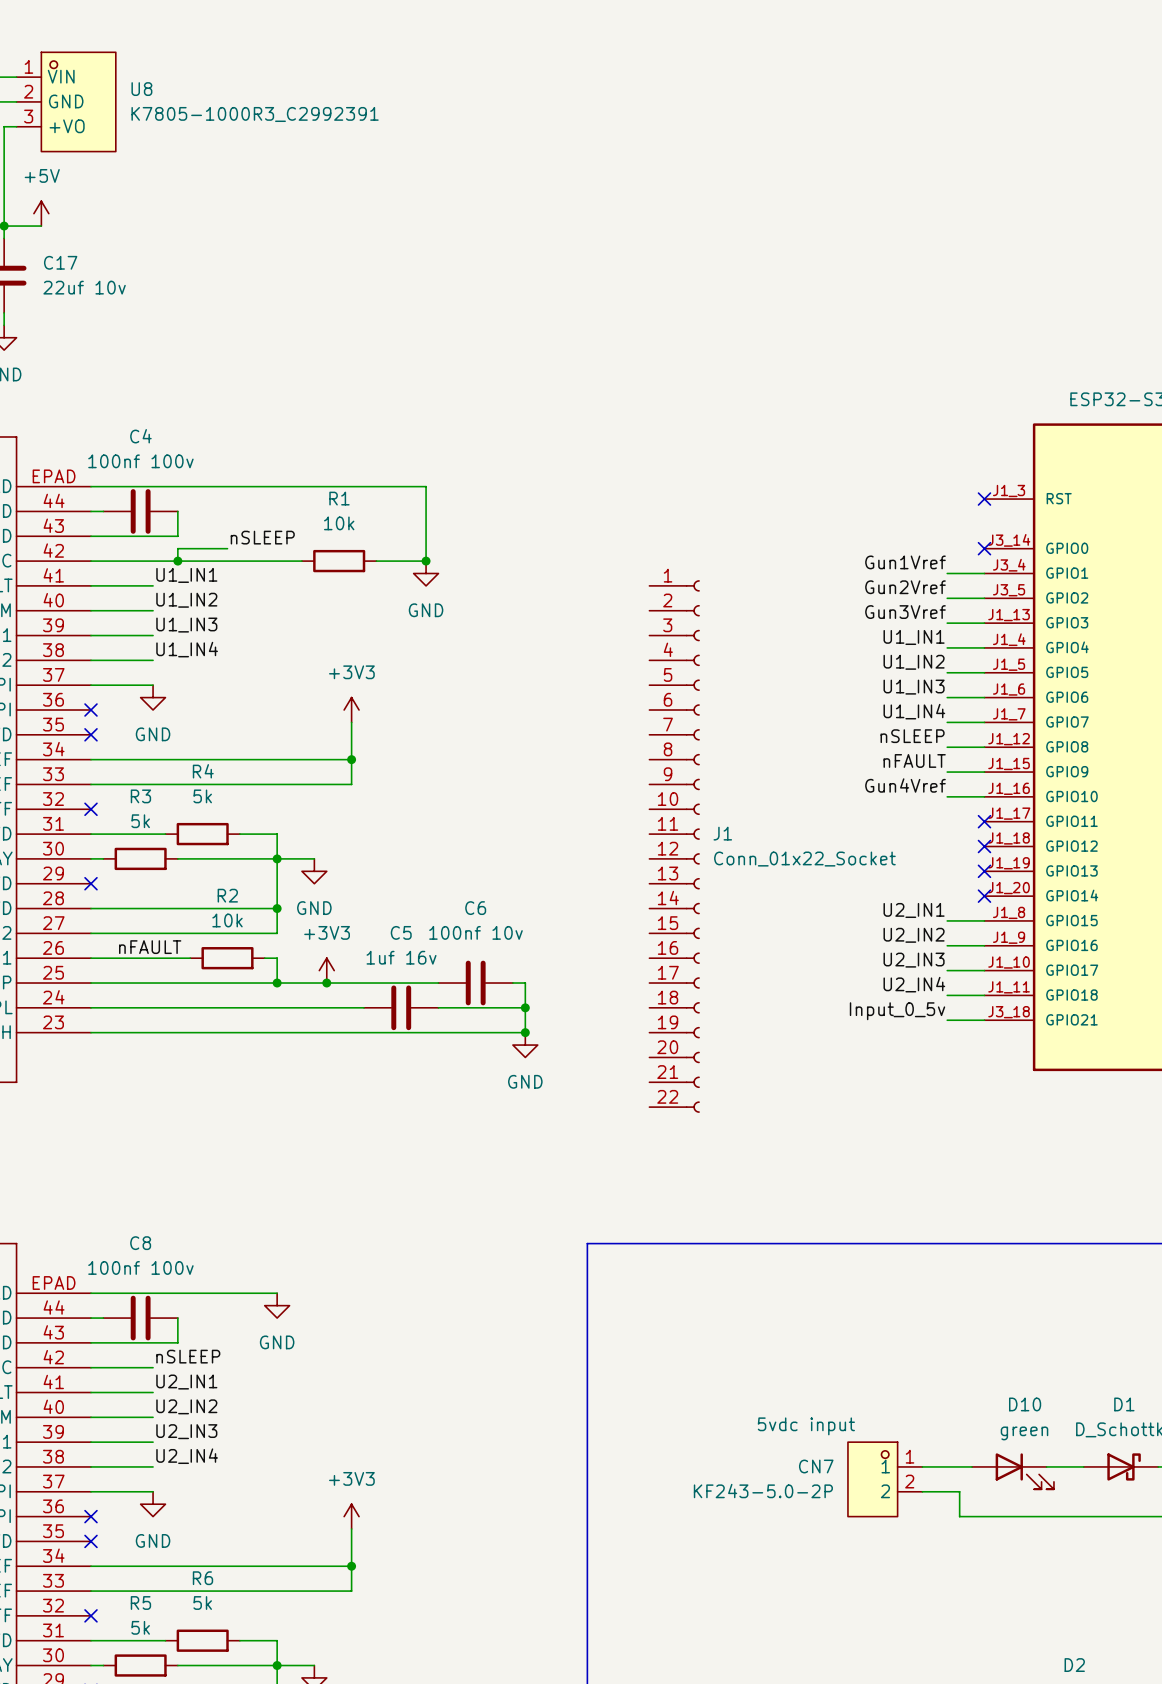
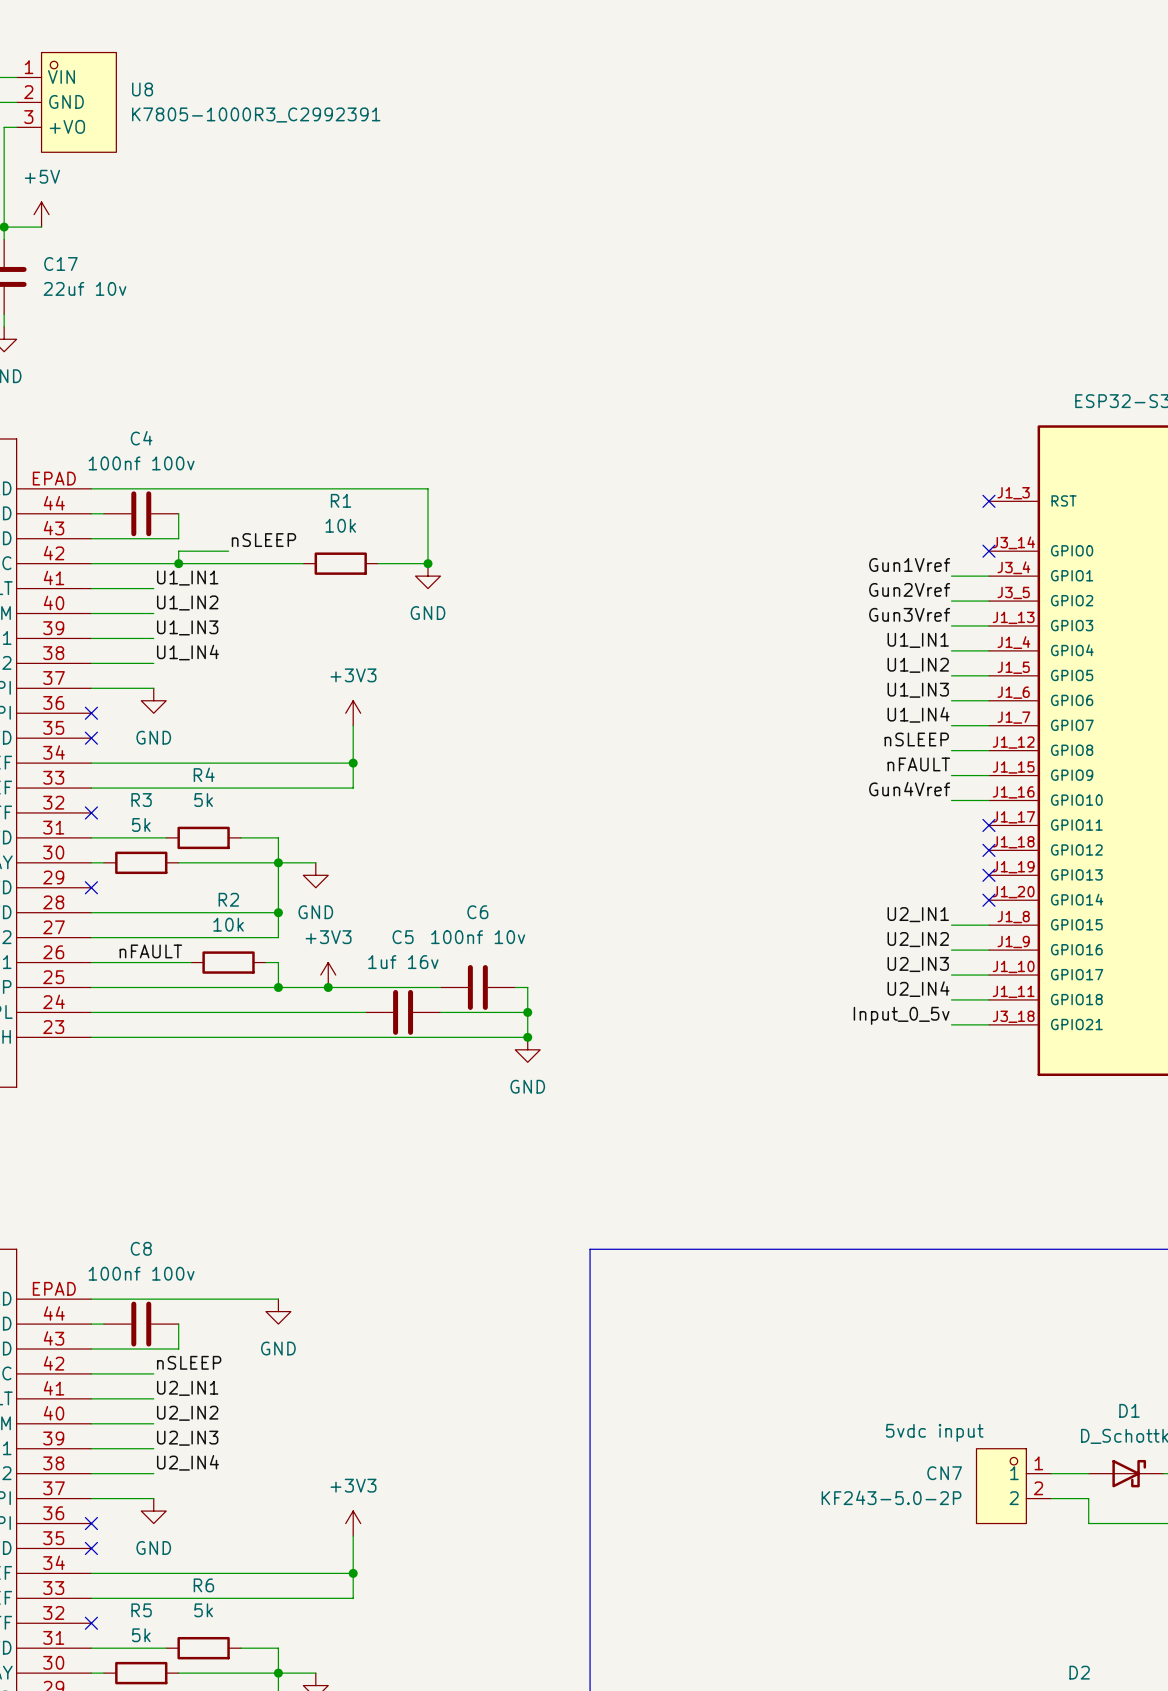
J1: Conn_01x22_Socket (674, 846) -> none
wire: (922, 1466) (972, 1466) -> none
D10: green (1013, 1471) -> none
CN7 position: (885, 1479) -> (1013, 1486)
wire: (922, 1491) (959, 1491) (959, 1516) (1083, 1516) -> (1051, 1498) (1088, 1498) (1088, 1523)

